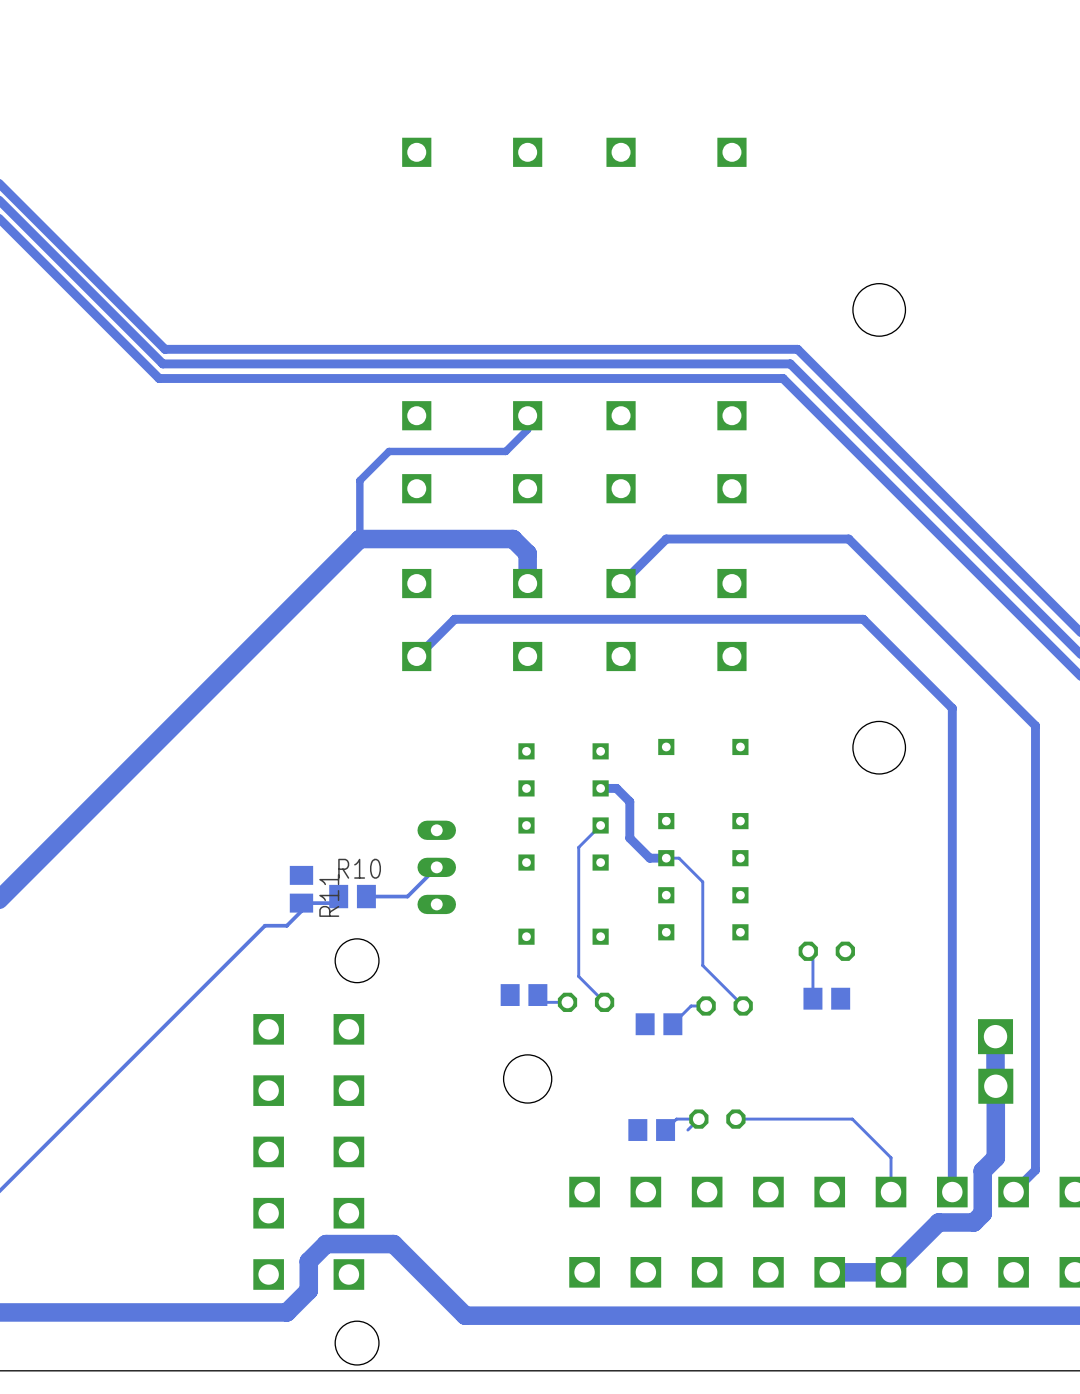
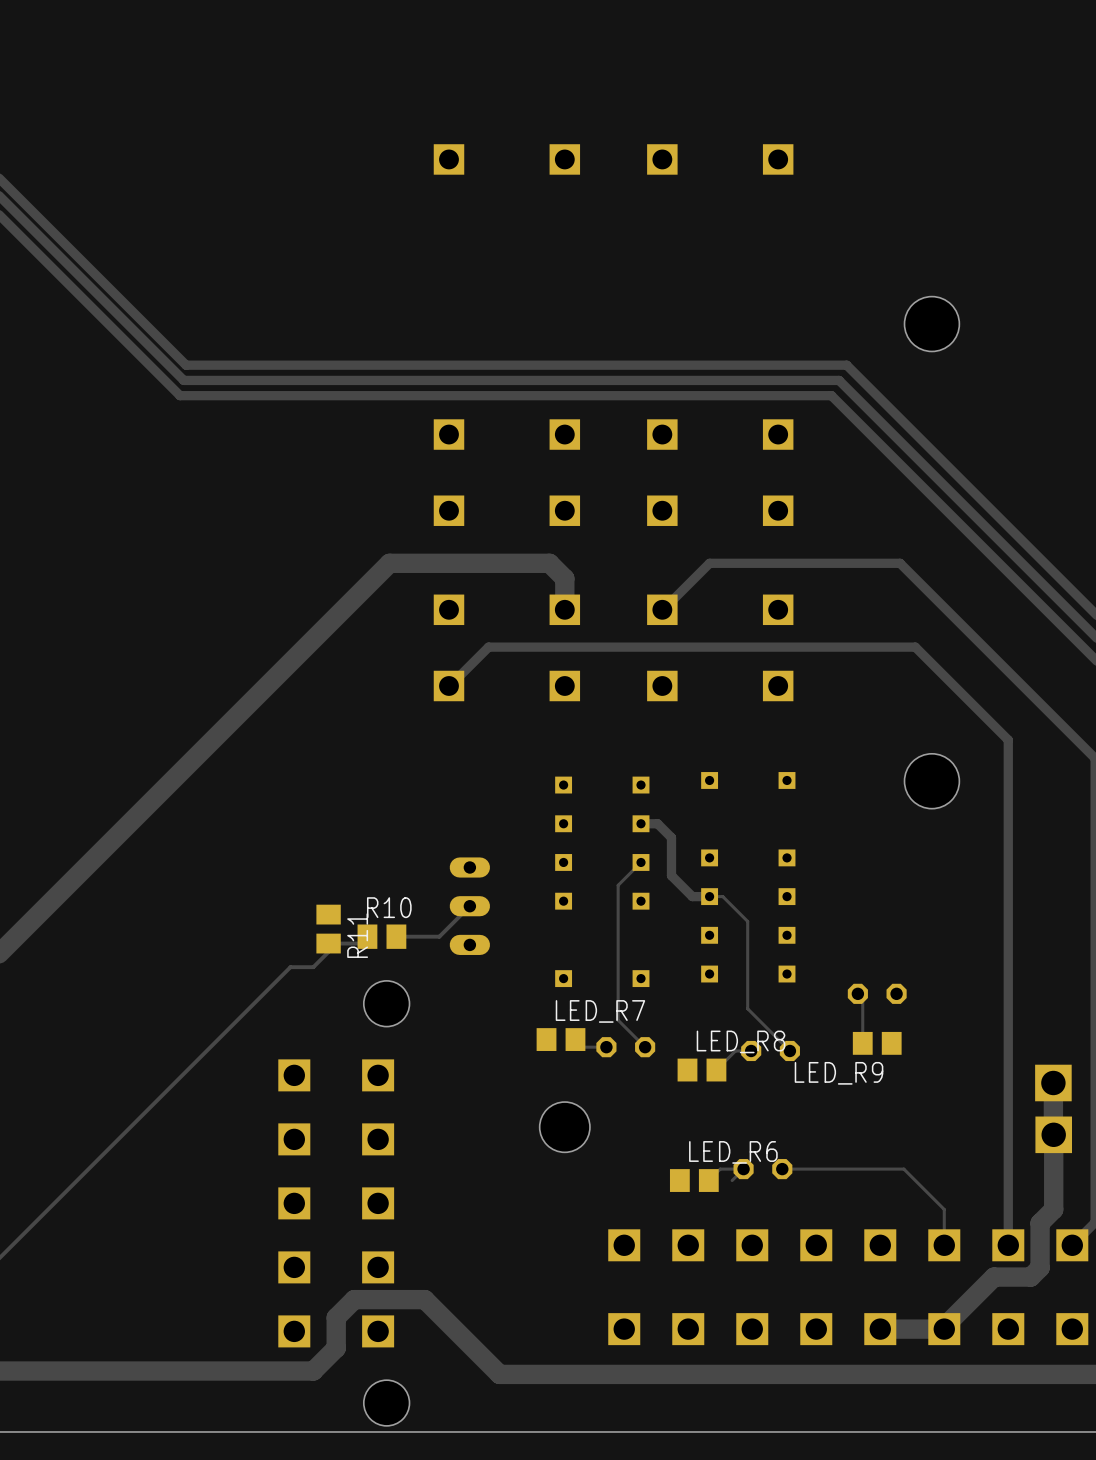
track: (527, 415) (527, 429) (505, 451) (389, 451) (359, 480) (359, 539) -> none
LED_R7 name: none -> LED_R7 (600, 1011)
LED_R8 name: none -> LED_R8 (741, 1041)
LED_R9 name: none -> LED_R9 (839, 1073)
LED_R6 name: none -> LED_R6 (733, 1152)

